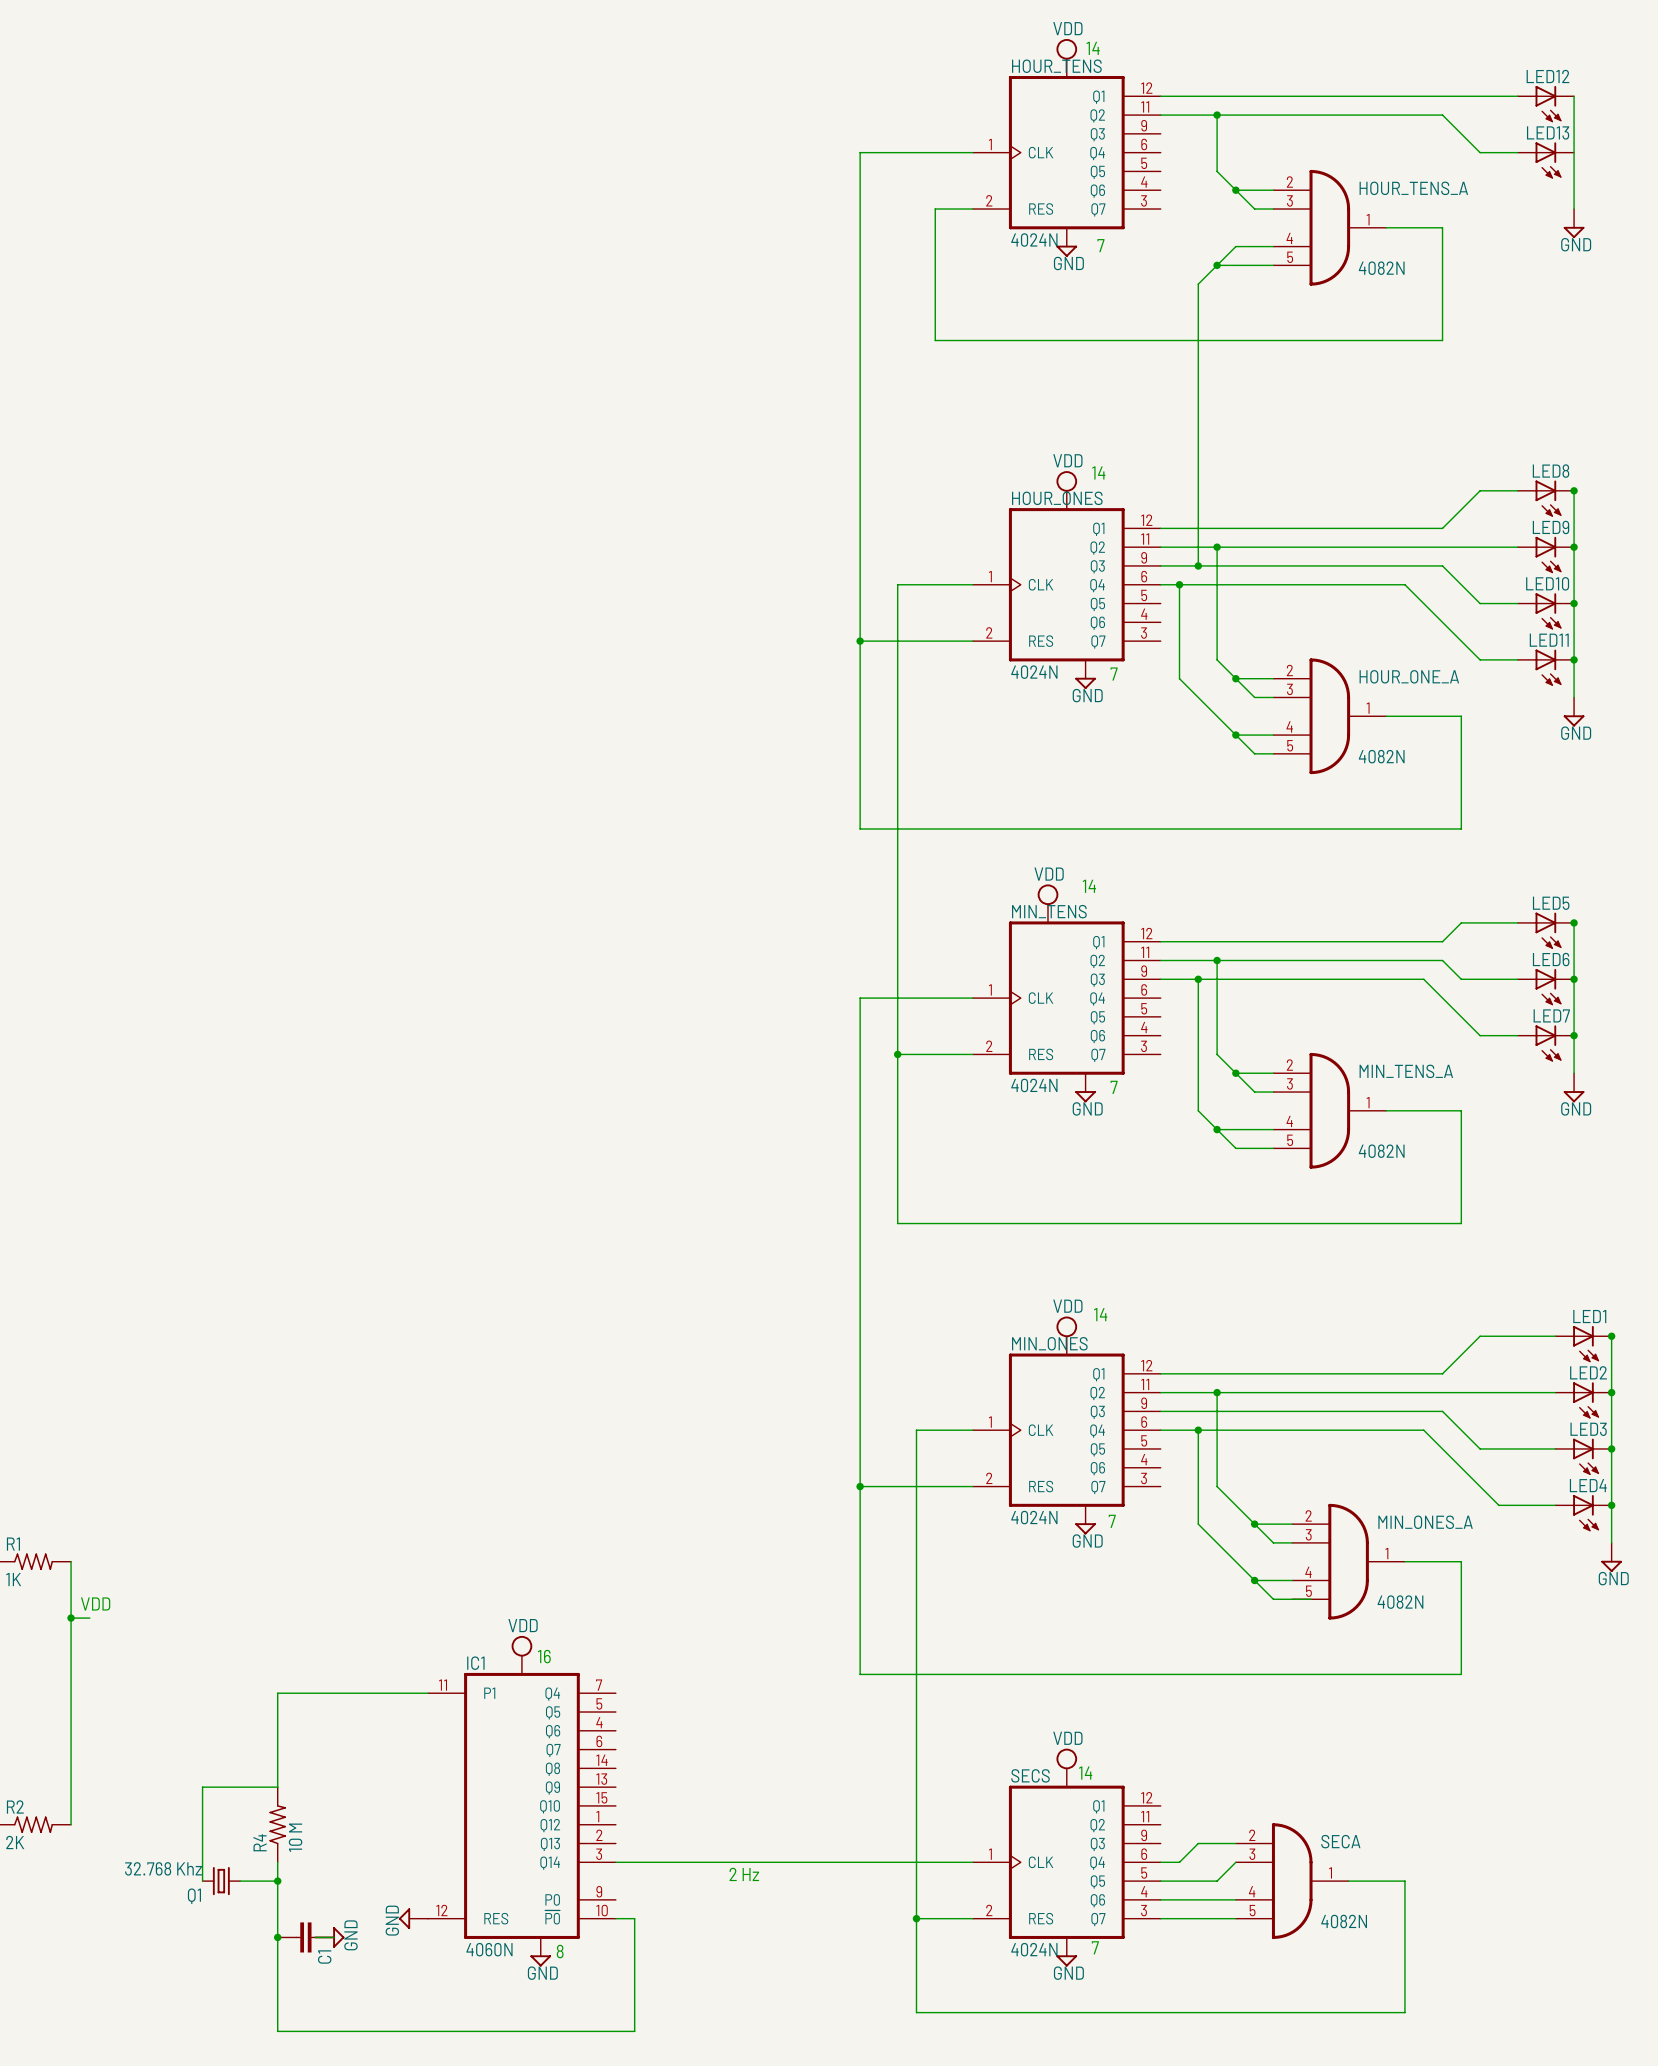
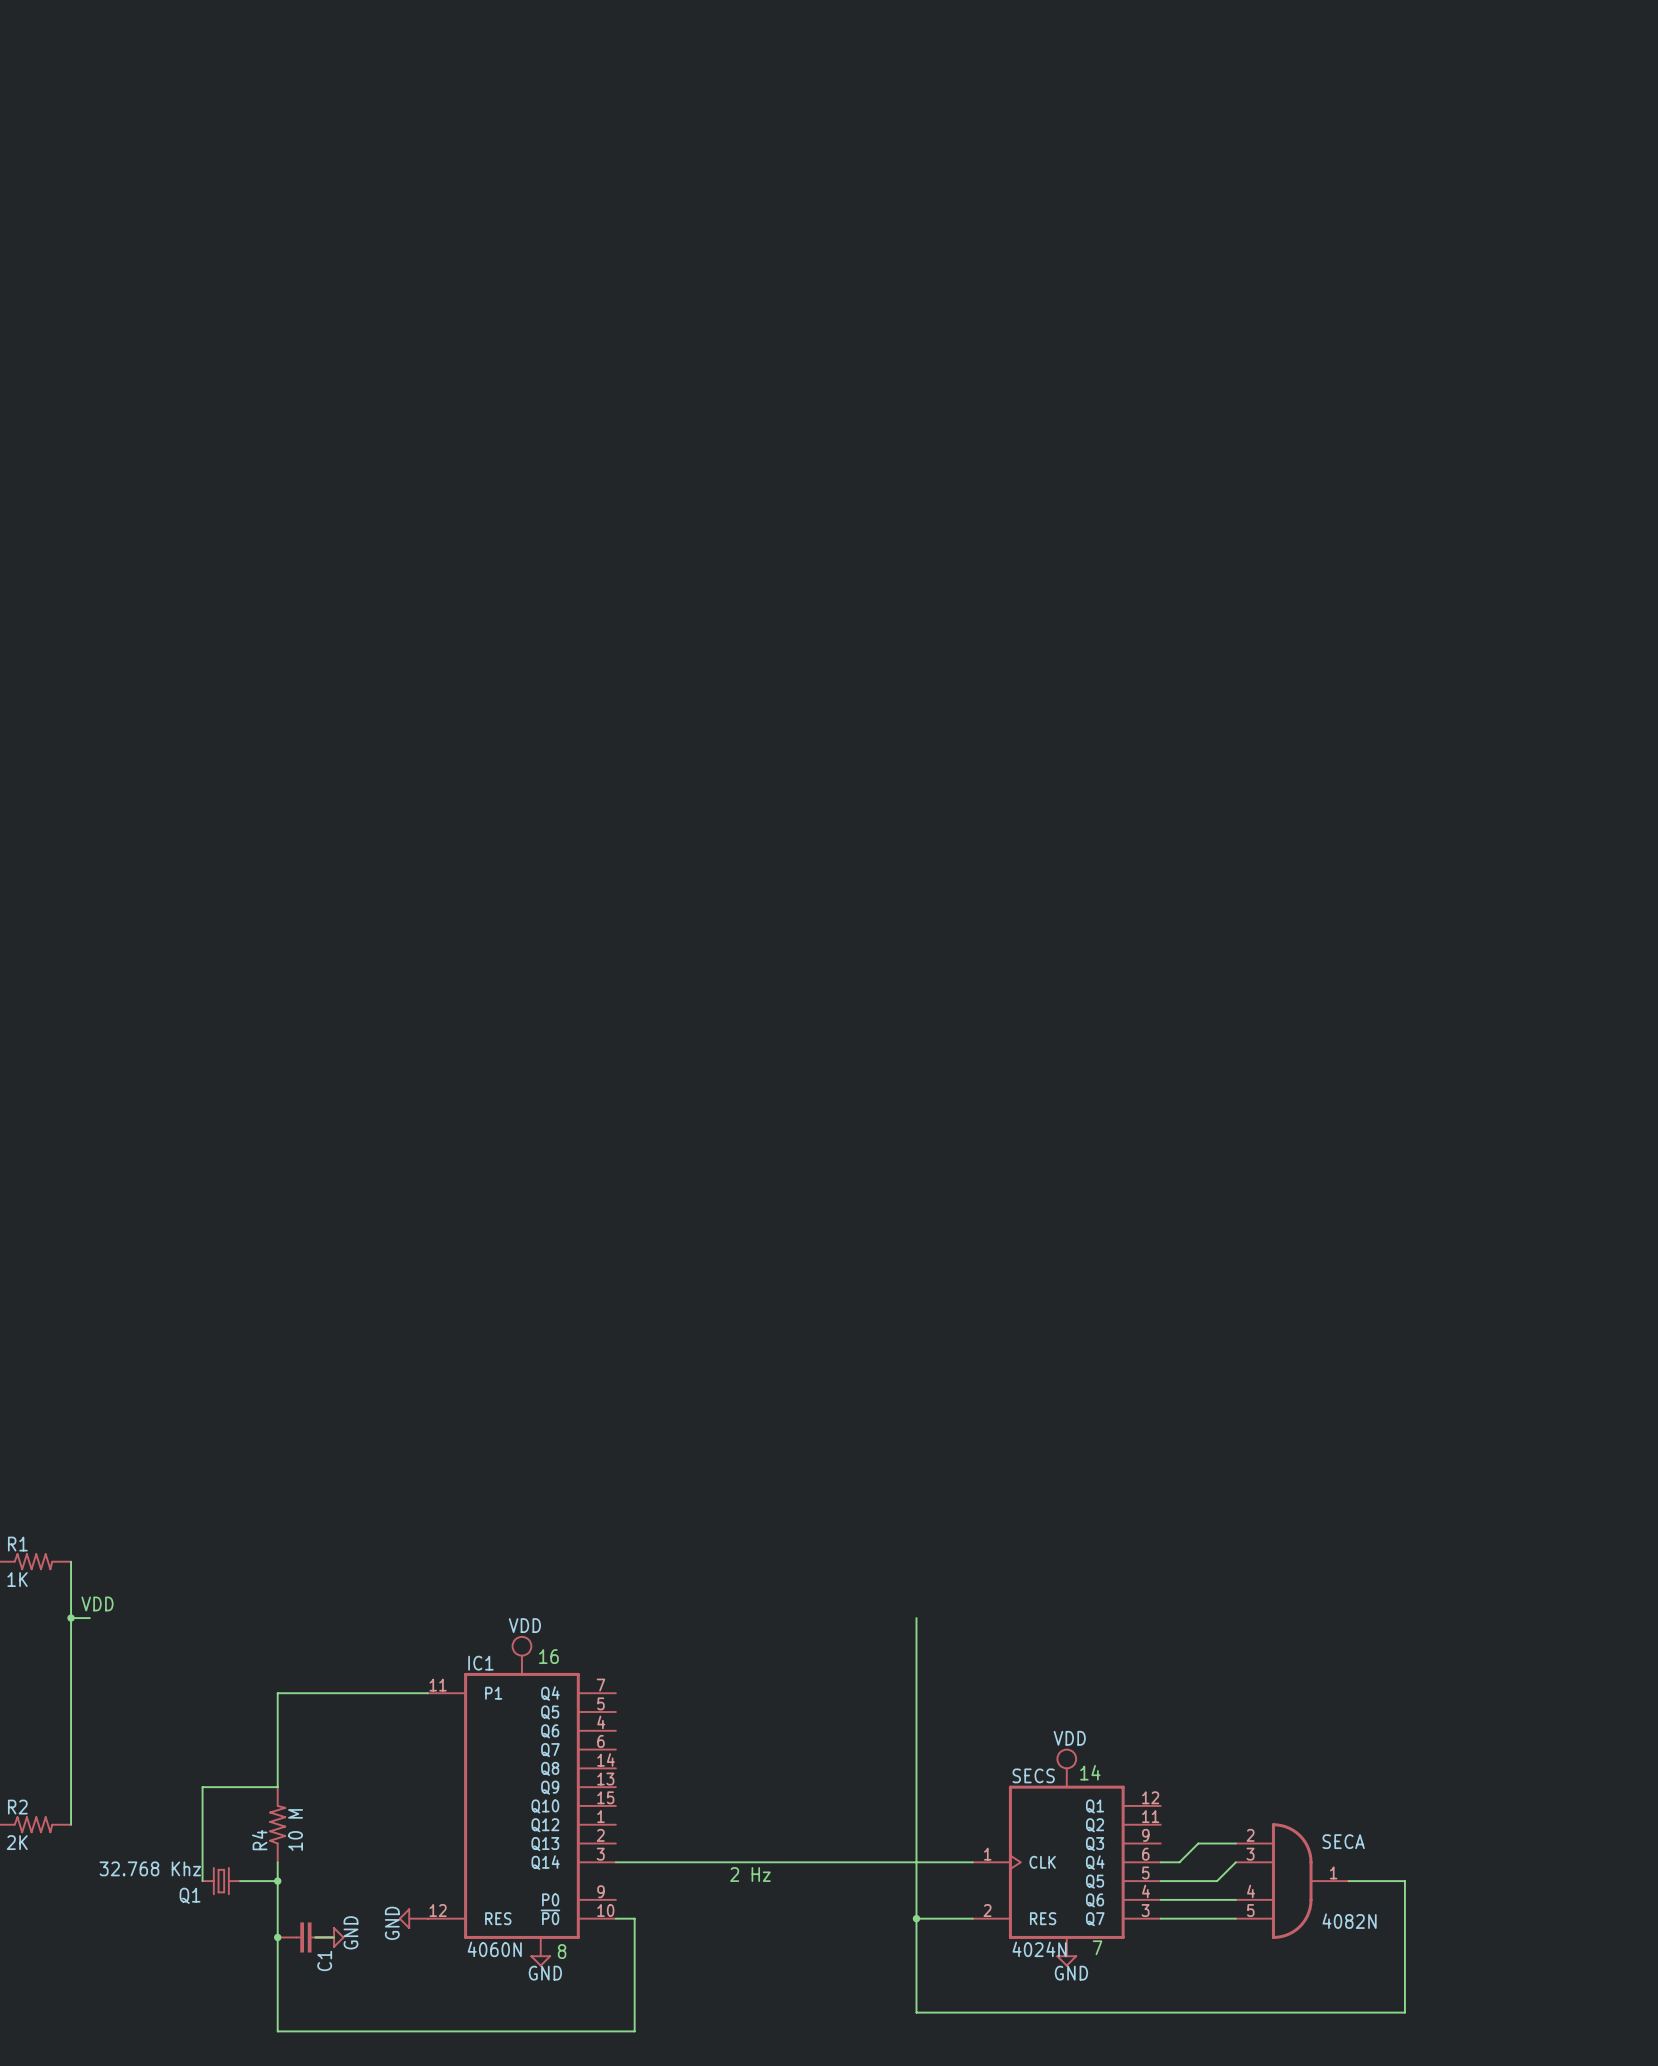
text: 14 (1093, 48) -> none
power symbol: VDD (1066, 58) -> none
wire: (1160, 96) (1517, 96) -> none
wire: (1574, 96) (1574, 209) -> none
LED12: (1545, 104) -> none
wire: (1160, 115) (1442, 115) (1480, 152) (1517, 152) -> none
wire: (1217, 115) (1217, 171) (1254, 209) (1273, 209) -> none
junction: (1217, 115) -> none
wire: (972, 152) (860, 152) (860, 828) (1461, 828) (1461, 716) (1386, 716) -> none
HOUR_TENS: 4024N (1066, 152) -> none
LED13: (1545, 160) -> none
wire: (1235, 190) (1273, 190) -> none
junction: (1235, 190) -> none
wire: (972, 209) (935, 209) (935, 340) (1442, 340) (1442, 227) (1386, 227) -> none
power symbol: GND (1574, 223) -> none
HOUR_TENS_A: 4082N (1329, 227) -> none
power symbol: GND (1066, 242) -> none
text: 7 (1100, 245) -> none
wire: (1273, 246) (1235, 246) (1198, 284) (1198, 565) -> none
wire: (1217, 265) (1273, 265) -> none
junction: (1217, 265) -> none
text: 14 (1098, 472) -> none
power symbol: VDD (1066, 490) -> none
wire: (1517, 490) (1480, 490) (1442, 528) (1160, 528) -> none
wire: (1574, 490) (1574, 697) -> none
junction: (1574, 490) -> none
LED8: (1545, 498) -> none
wire: (1160, 547) (1517, 547) -> none
wire: (1217, 547) (1217, 659) (1254, 697) (1273, 697) -> none
junction: (1217, 547) -> none
junction: (1574, 547) -> none
LED9: (1545, 554) -> none
wire: (1160, 565) (1442, 565) (1480, 603) (1517, 603) -> none
junction: (1198, 565) -> none
wire: (972, 584) (897, 584) (897, 1223) (1461, 1223) (1461, 1110) (1386, 1110) -> none
HOUR_ONES: 4024N (1066, 584) -> none
wire: (1160, 584) (1404, 584) (1480, 659) (1517, 659) -> none
wire: (1179, 584) (1179, 678) (1254, 753) (1273, 753) -> none
junction: (1179, 584) -> none
junction: (1574, 603) -> none
LED10: (1545, 611) -> none
wire: (860, 641) (972, 641) -> none
junction: (860, 641) -> none
junction: (1574, 659) -> none
LED11: (1545, 667) -> none
power symbol: GND (1085, 674) -> none
text: 7 (1114, 674) -> none
wire: (1235, 678) (1273, 678) -> none
junction: (1235, 678) -> none
power symbol: GND (1574, 712) -> none
HOUR_ONE_A: 4082N (1329, 716) -> none
wire: (1235, 735) (1273, 735) -> none
junction: (1235, 735) -> none
text: 14 (1089, 886) -> none
power symbol: VDD (1048, 903) -> none
wire: (1517, 922) (1461, 922) (1442, 941) (1160, 941) -> none
wire: (1574, 922) (1574, 1073) -> none
junction: (1574, 922) -> none
LED5: (1545, 930) -> none
wire: (1160, 960) (1442, 960) (1461, 979) (1517, 979) -> none
wire: (1217, 960) (1217, 1054) (1254, 1092) (1273, 1092) -> none
junction: (1217, 960) -> none
wire: (1160, 979) (1423, 979) (1480, 1035) (1517, 1035) -> none
wire: (1198, 979) (1198, 1110) (1235, 1148) (1273, 1148) -> none
junction: (1198, 979) -> none
junction: (1574, 979) -> none
LED6: (1545, 987) -> none
wire: (972, 998) (860, 998) (860, 1674) (1461, 1674) (1461, 1561) (1404, 1561) -> none
MIN_TENS: 4024N (1066, 998) -> none
junction: (1574, 1035) -> none
LED7: (1545, 1043) -> none
wire: (897, 1054) (972, 1054) -> none
junction: (897, 1054) -> none
wire: (1235, 1073) (1273, 1073) -> none
junction: (1235, 1073) -> none
power symbol: GND (1085, 1087) -> none
text: 7 (1114, 1087) -> none
power symbol: GND (1574, 1087) -> none
MIN_TENS_A: 4082N (1329, 1110) -> none
wire: (1217, 1129) (1273, 1129) -> none
junction: (1217, 1129) -> none
text: 14 (1100, 1314) -> none
power symbol: VDD (1066, 1335) -> none
wire: (1555, 1336) (1480, 1336) (1442, 1373) (1160, 1373) -> none
wire: (1611, 1336) (1611, 1542) -> none
junction: (1611, 1336) -> none
LED1: (1583, 1344) -> none
wire: (1160, 1392) (1555, 1392) -> none
wire: (1217, 1392) (1217, 1486) (1273, 1542) (1292, 1542) -> none
junction: (1217, 1392) -> none
junction: (1611, 1392) -> none
LED2: (1583, 1400) -> none
wire: (1160, 1411) (1442, 1411) (1480, 1448) (1555, 1448) -> none
wire: (972, 1430) (916, 1430) (916, 1618) -> none
MIN_ONES: 4024N (1066, 1430) -> none
wire: (1160, 1430) (1423, 1430) (1498, 1505) (1555, 1505) -> none
wire: (1198, 1430) (1198, 1524) (1273, 1599) (1311, 1599) -> none
junction: (1198, 1430) -> none
junction: (1611, 1448) -> none
LED3: (1583, 1456) -> none
wire: (860, 1486) (972, 1486) -> none
junction: (860, 1486) -> none
junction: (1611, 1505) -> none
LED4: (1583, 1513) -> none
power symbol: GND (1085, 1519) -> none
text: 7 (1112, 1521) -> none
wire: (1254, 1524) (1292, 1524) -> none
junction: (1254, 1524) -> none
power symbol: GND (1611, 1557) -> none
MIN_ONES_A: 4082N (1348, 1561) -> none
wire: (1254, 1580) (1292, 1580) -> none
junction: (1254, 1580) -> none

